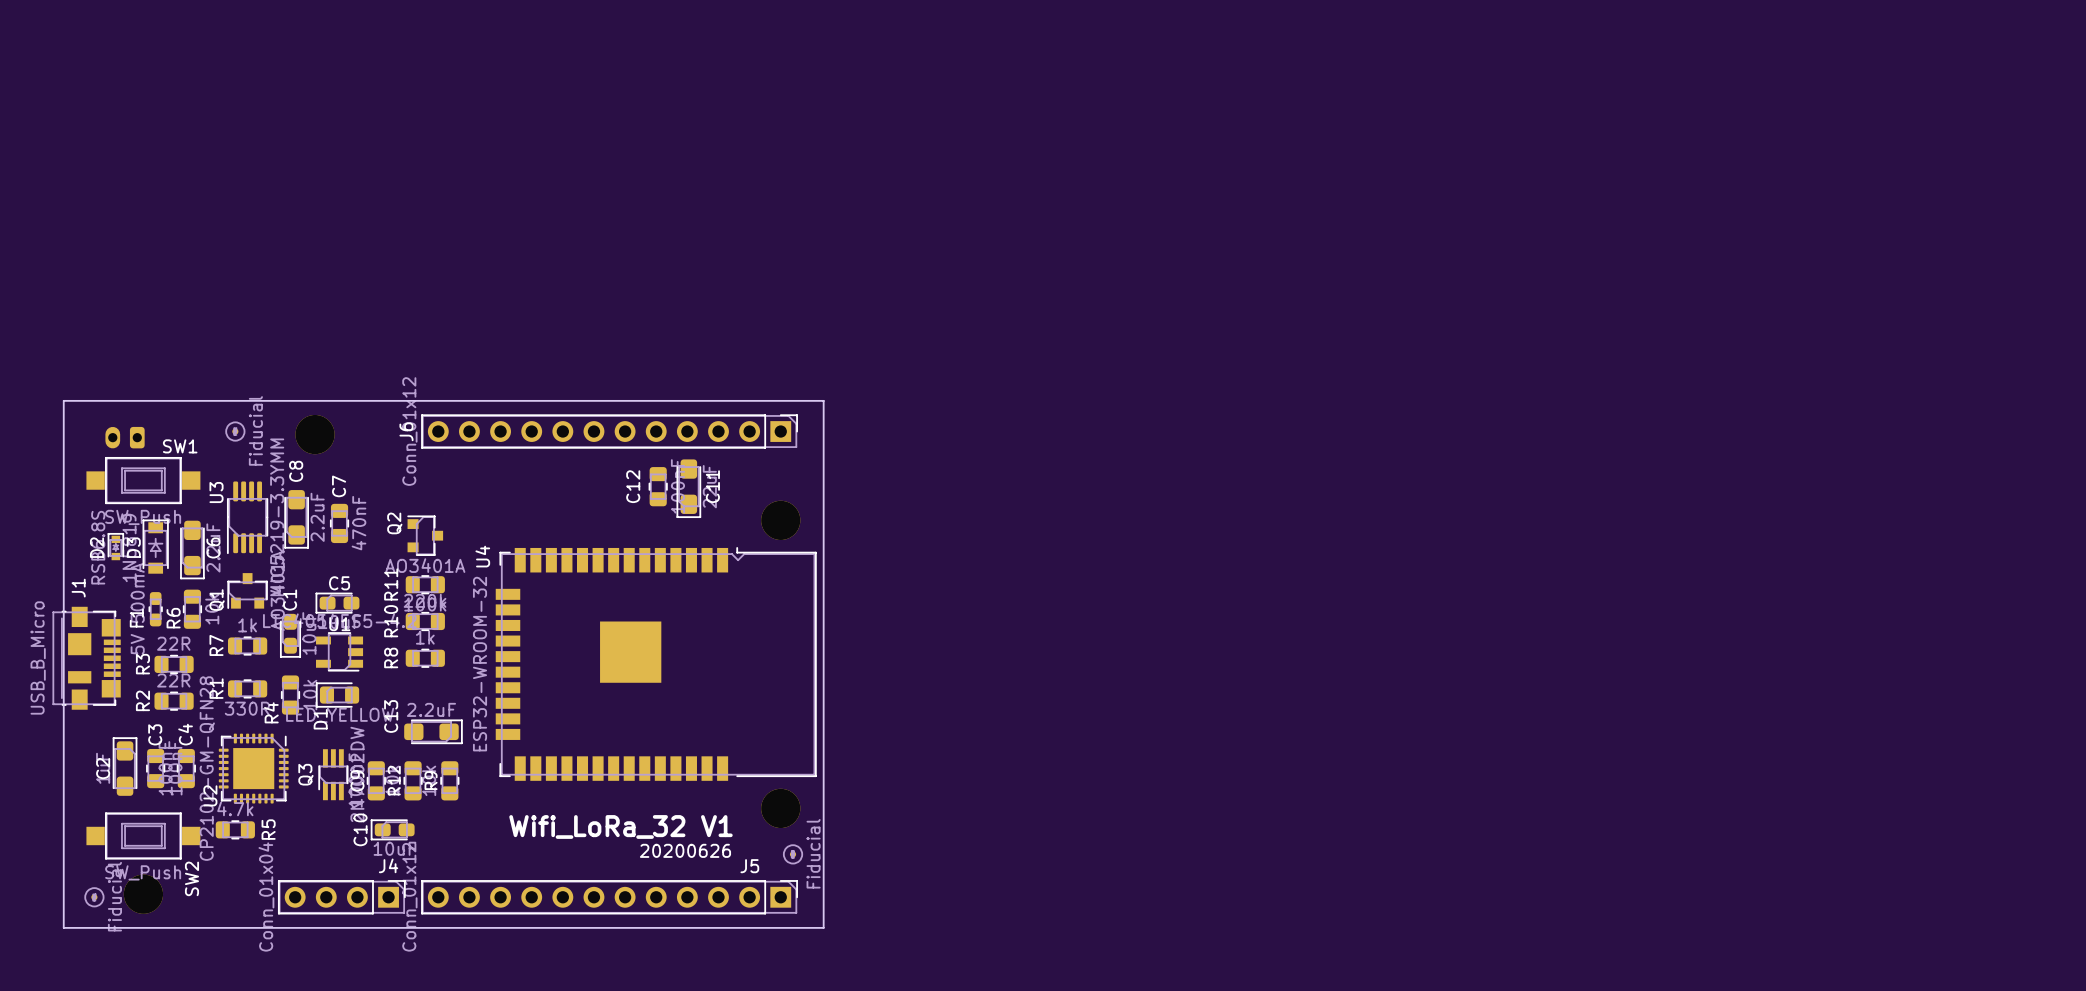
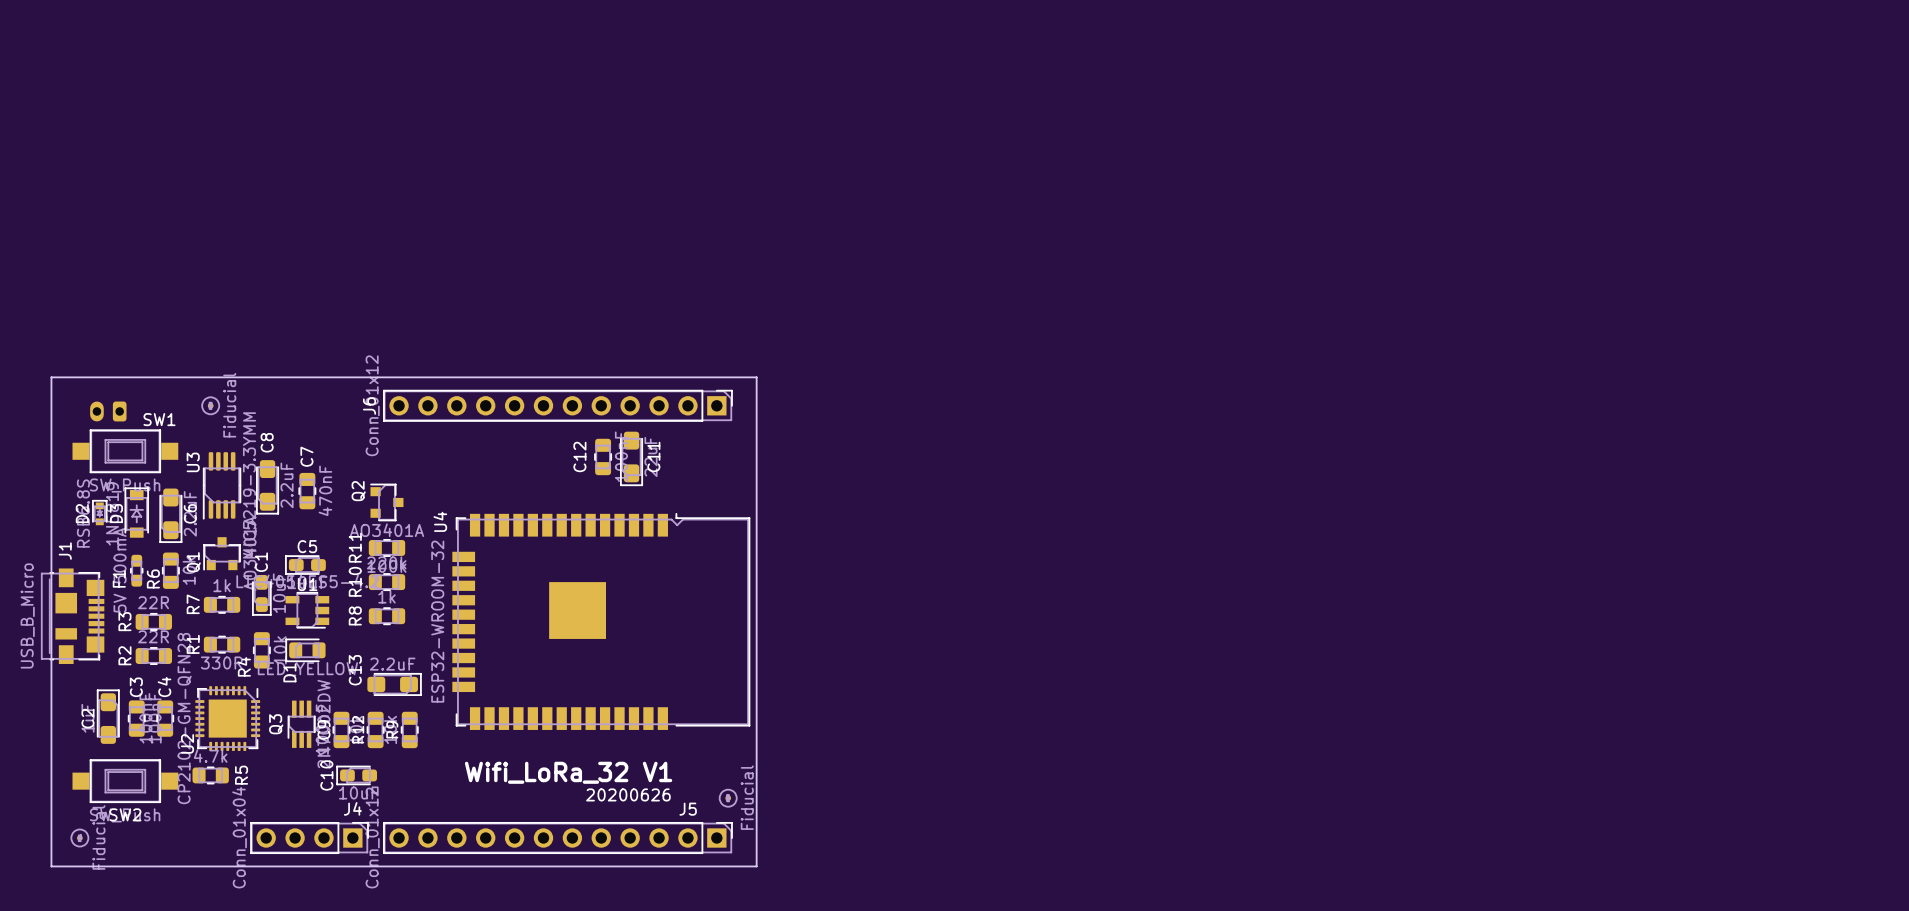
part: (315, 434) -> none
part: (780, 520) -> none
part: (780, 808) -> none
SW2 name rotation: 0° (191, 878) -> 90° clockwise (125, 814)
SW2 name position: SW2 (191, 878) -> SW2 (125, 814)
part: (143, 894) -> none

